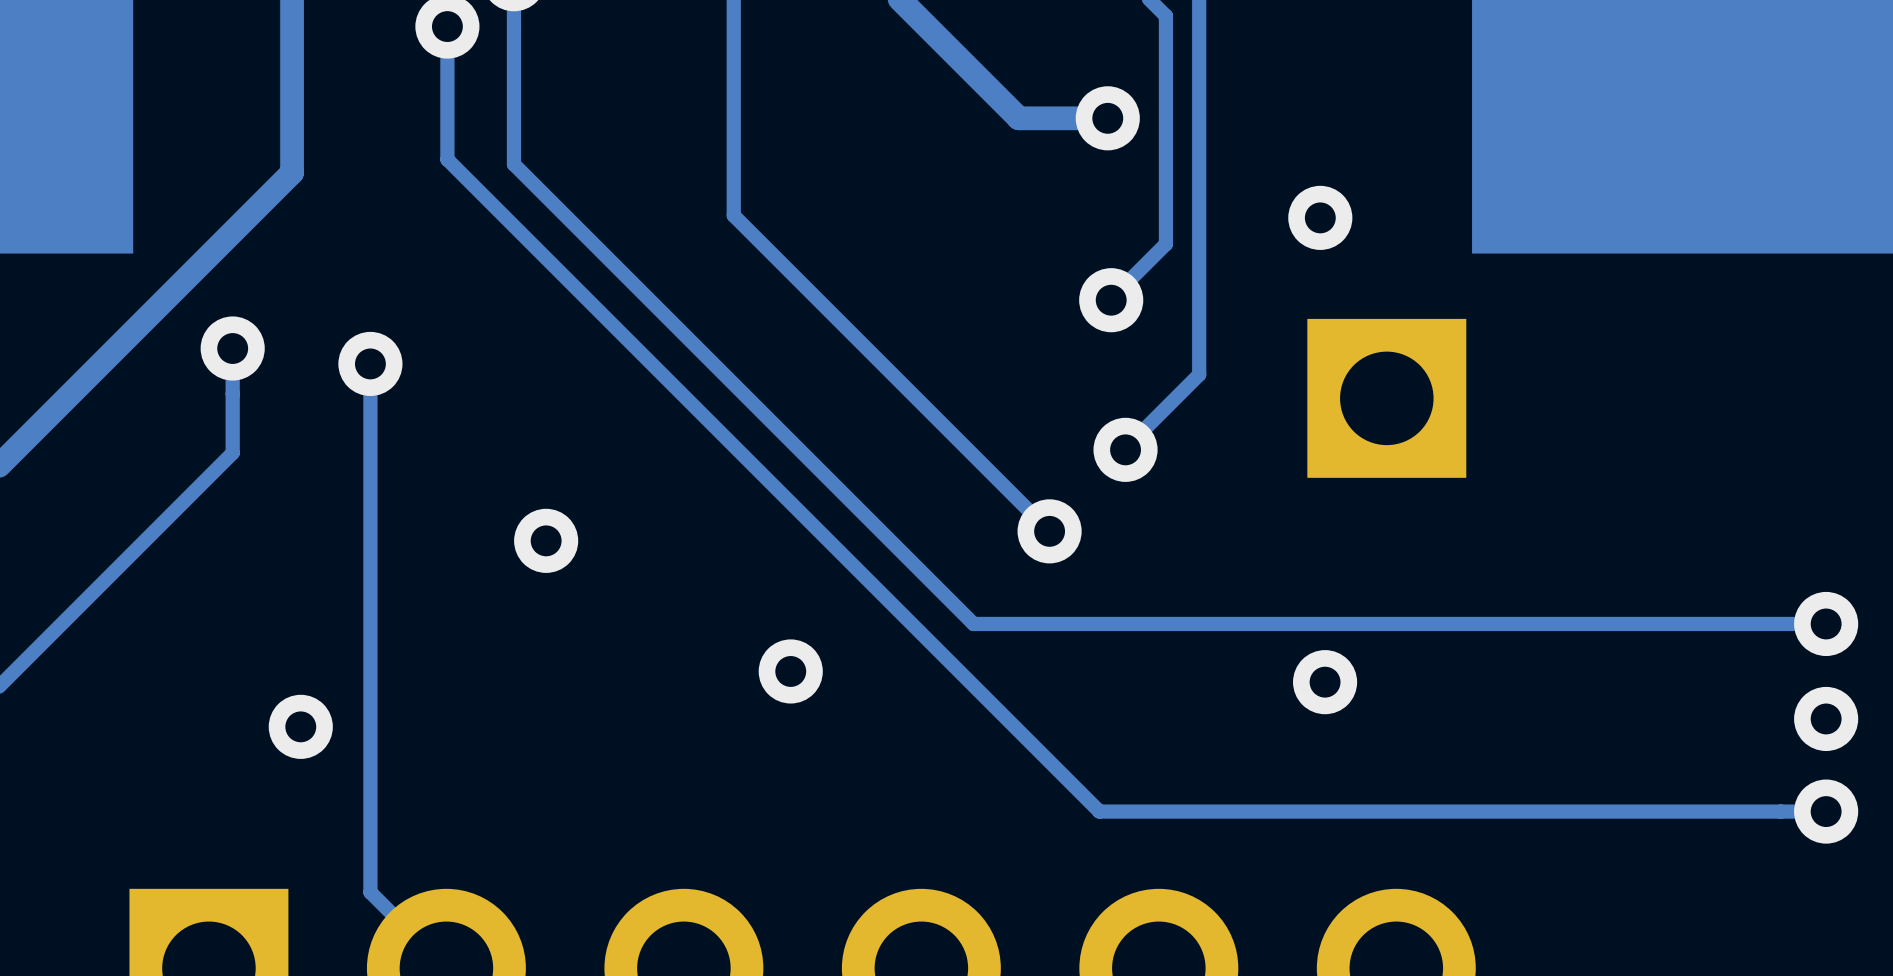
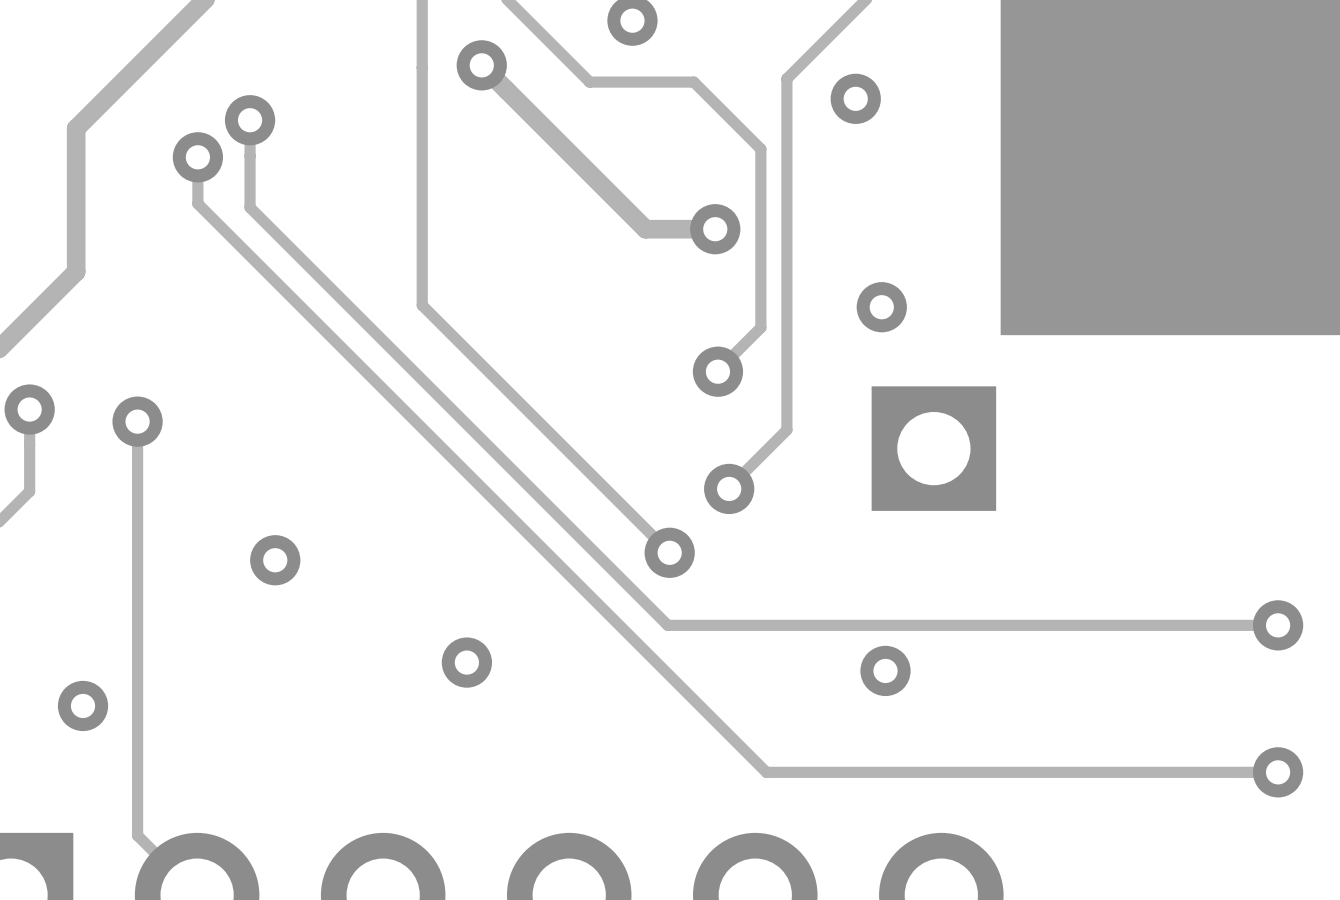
track: (447, 85) (447, 159) (1099, 811) (1173, 811) -> (197, 203) (766, 772)
track: (513, 90) (513, 164) (973, 623) (1047, 623) -> (250, 207) (667, 625)
via: (1826, 718) -> none

